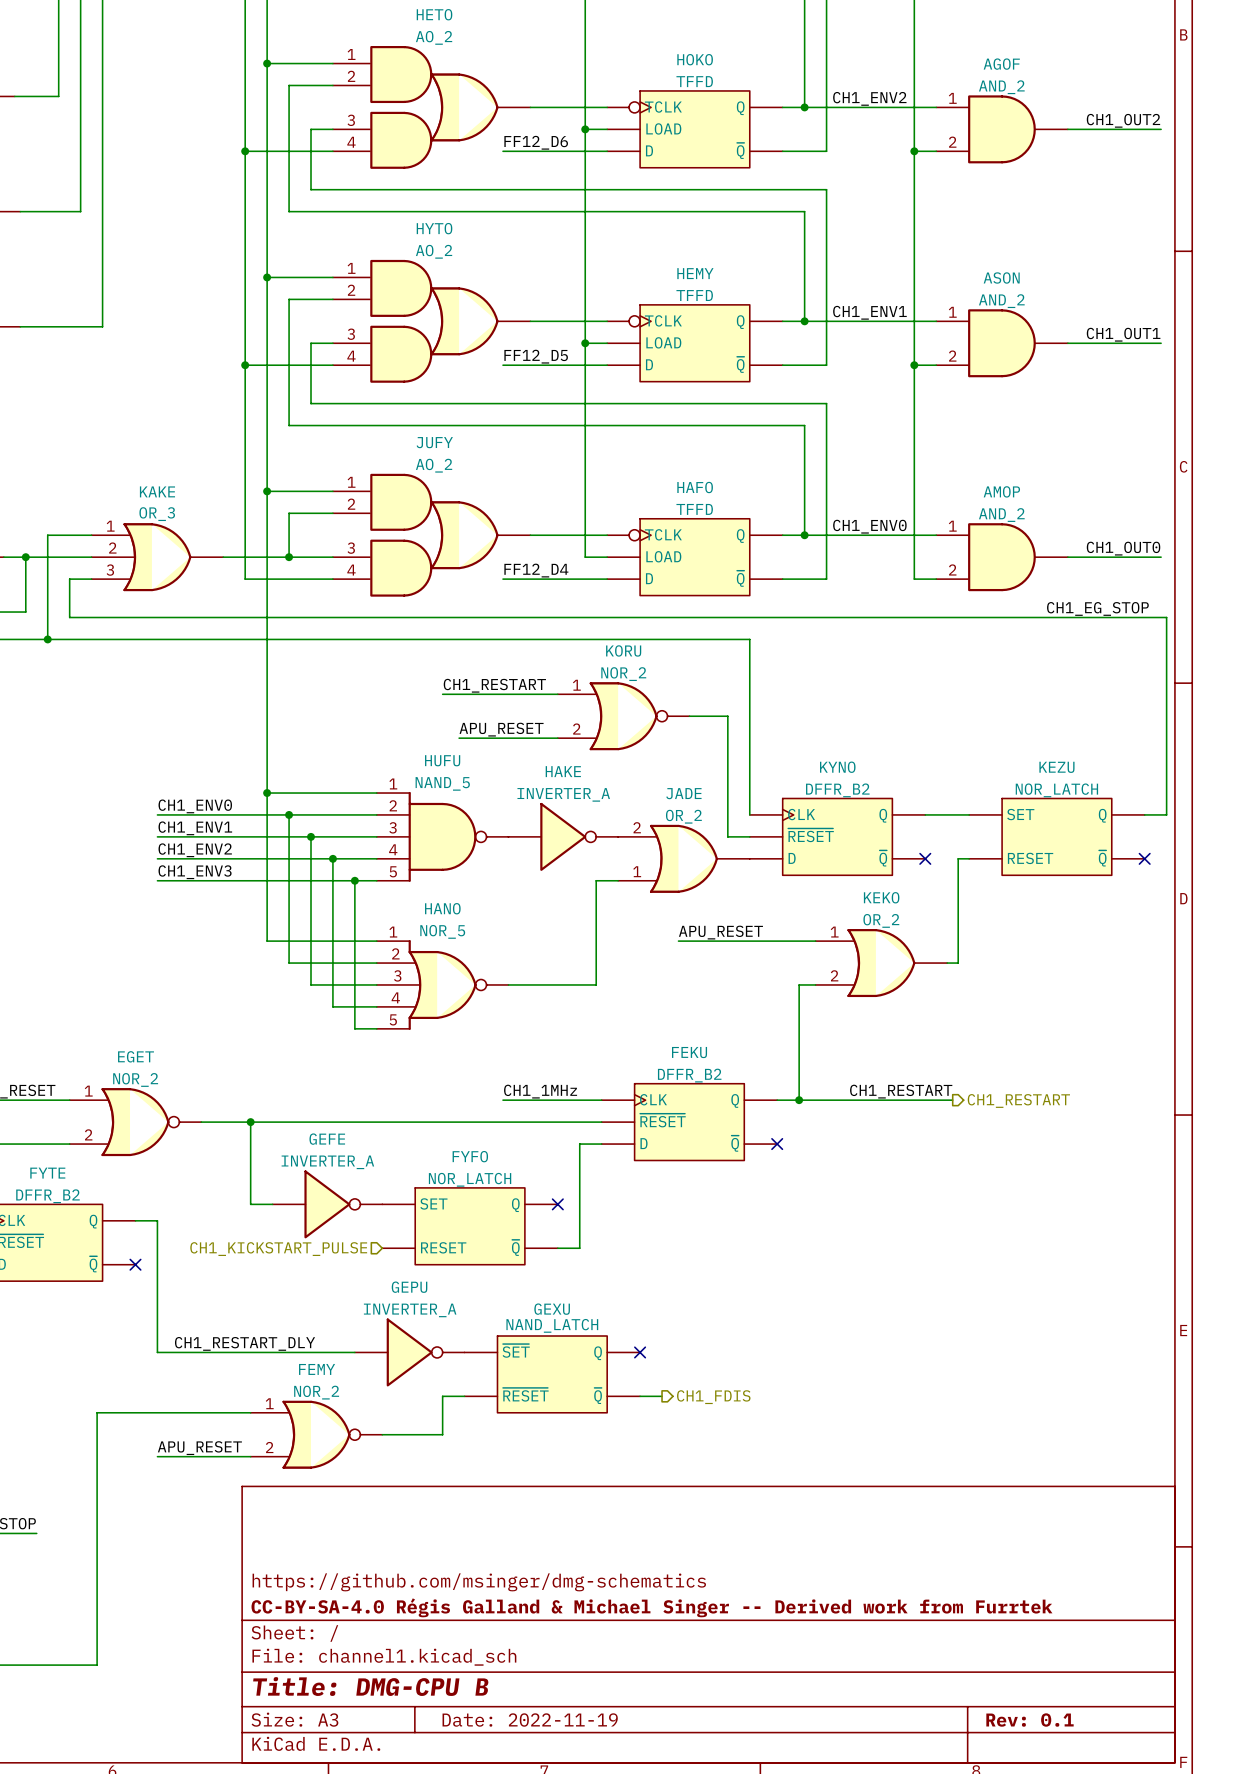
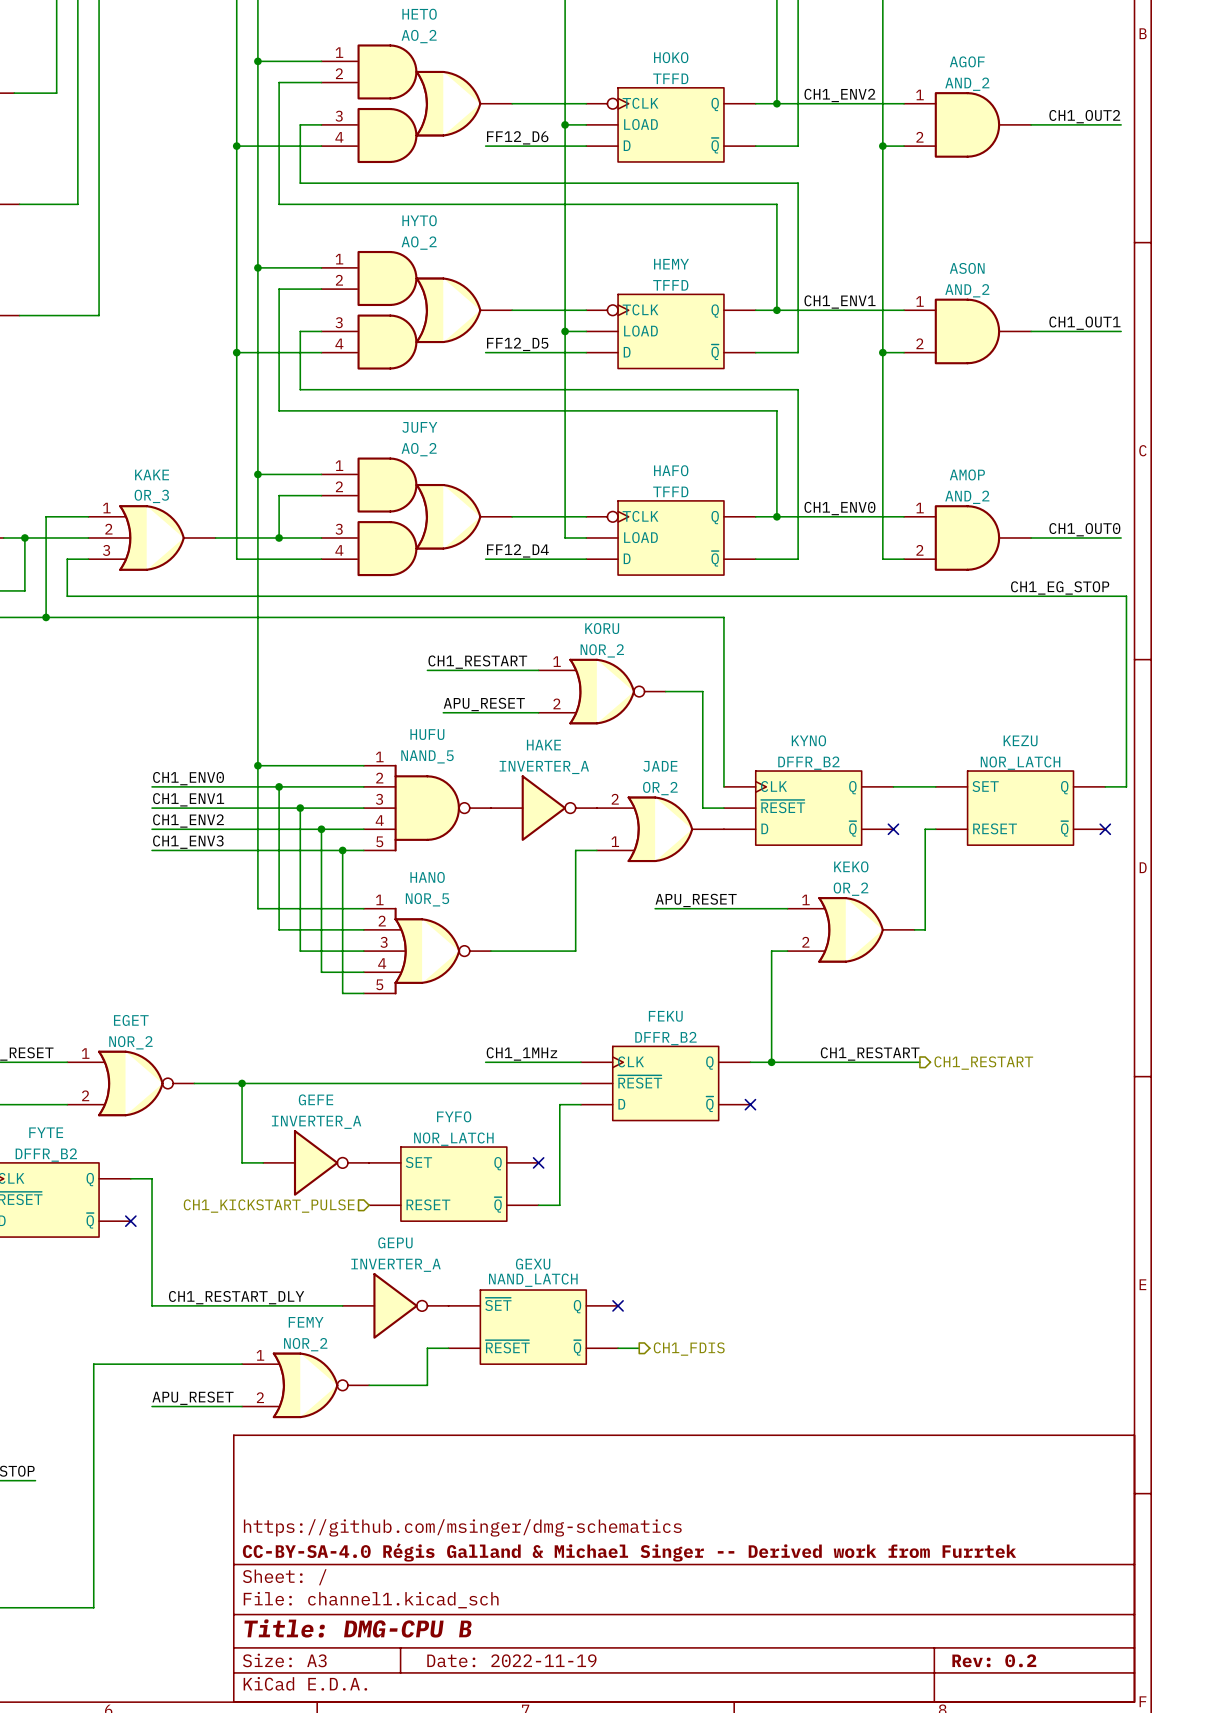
title block: Rev: 0.1 (1030, 1720) -> Rev: 0.2 (994, 1660)

